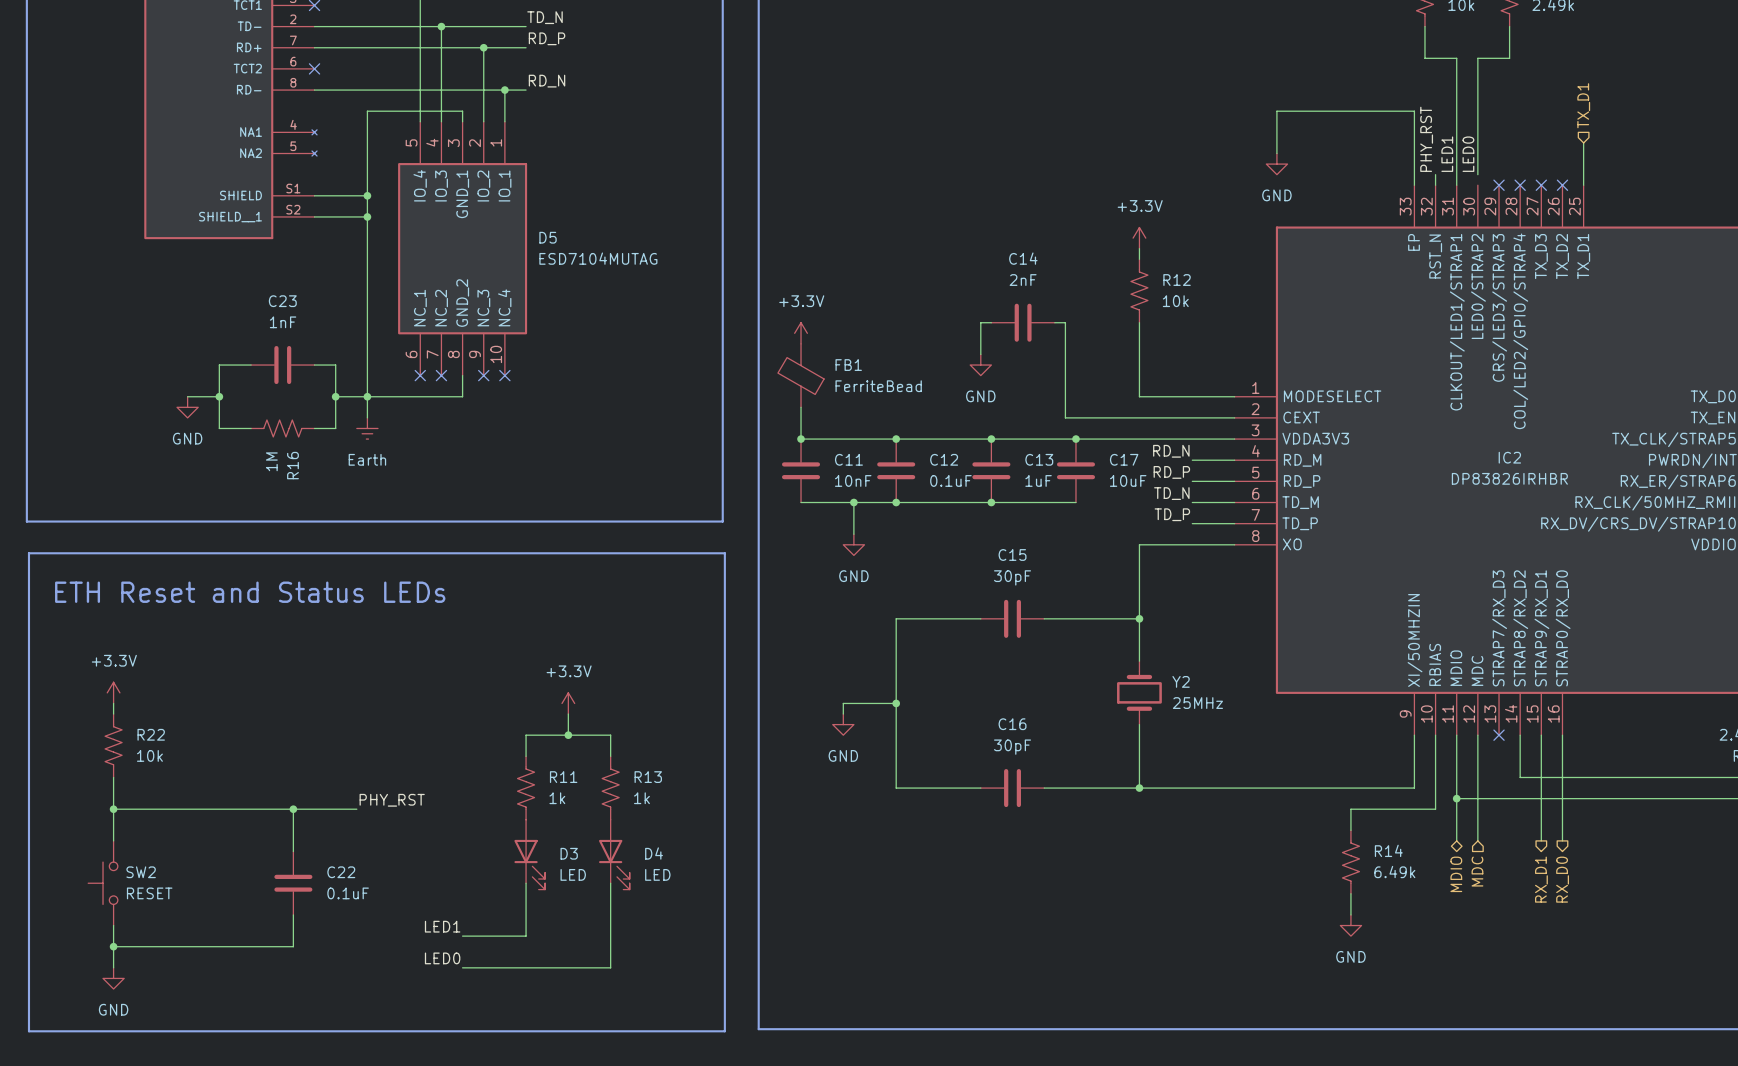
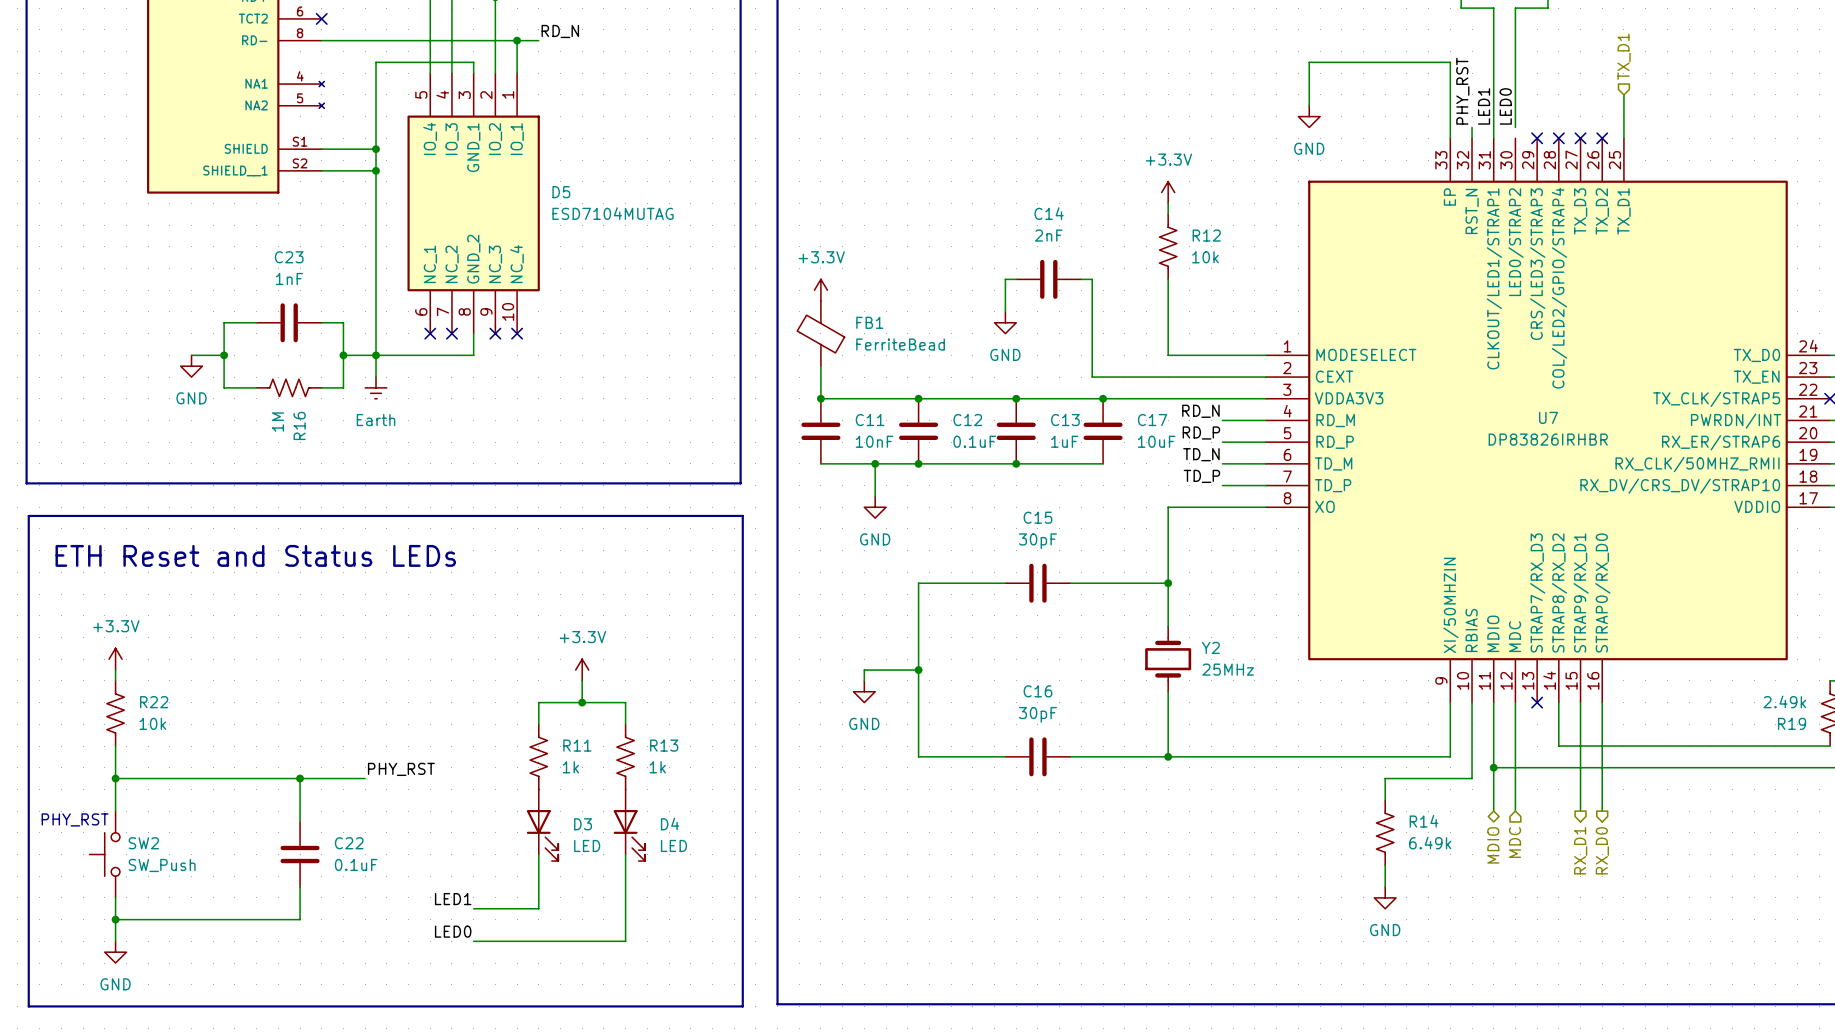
IC2 name: IC2 (1509, 457) -> U7 (1548, 417)
text: none -> PHY_RST (75, 819)
SW2 value: RESET (149, 893) -> SW_Push (162, 865)

